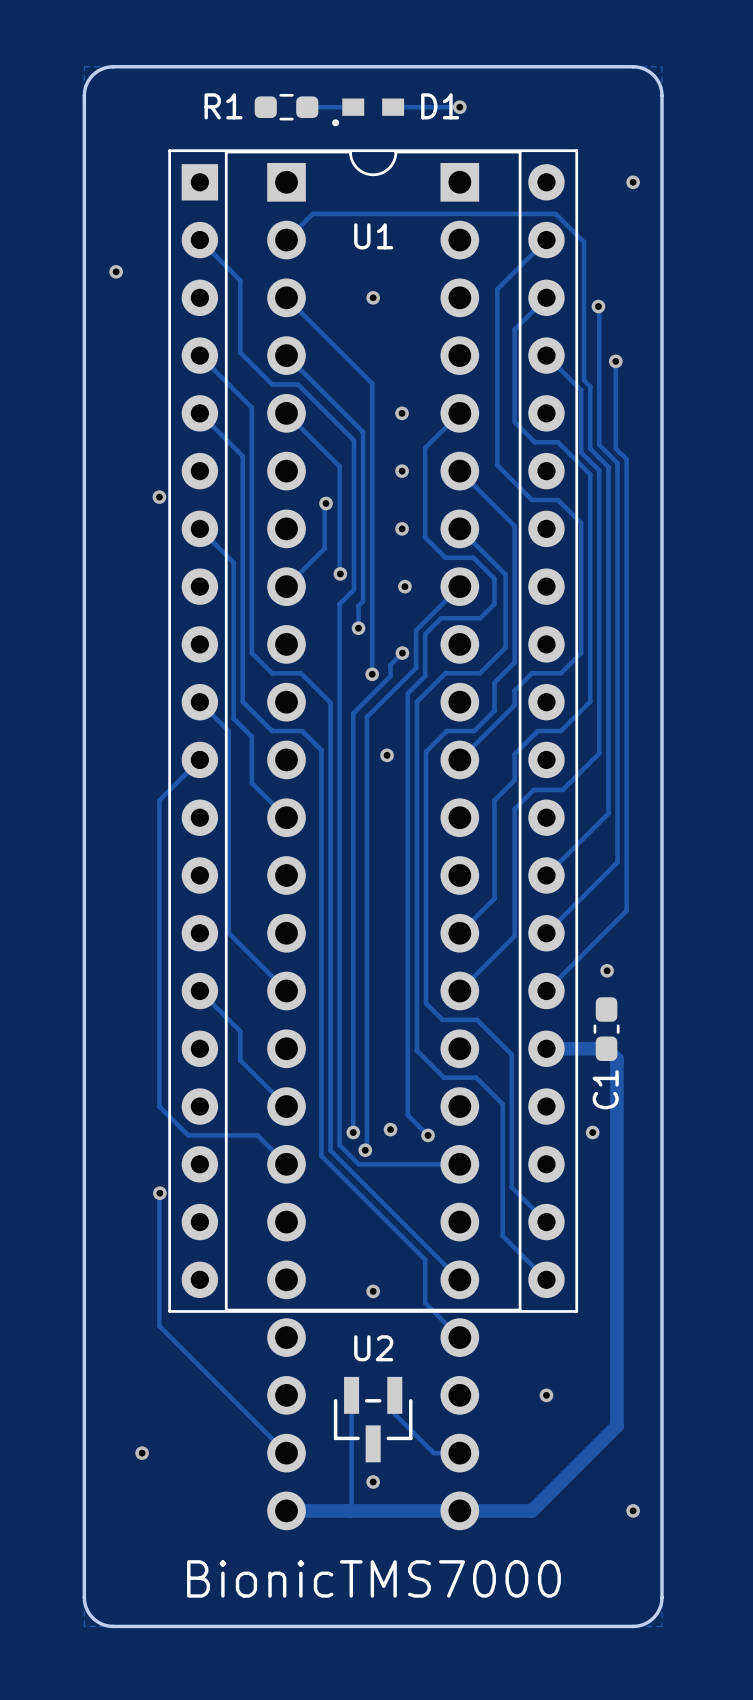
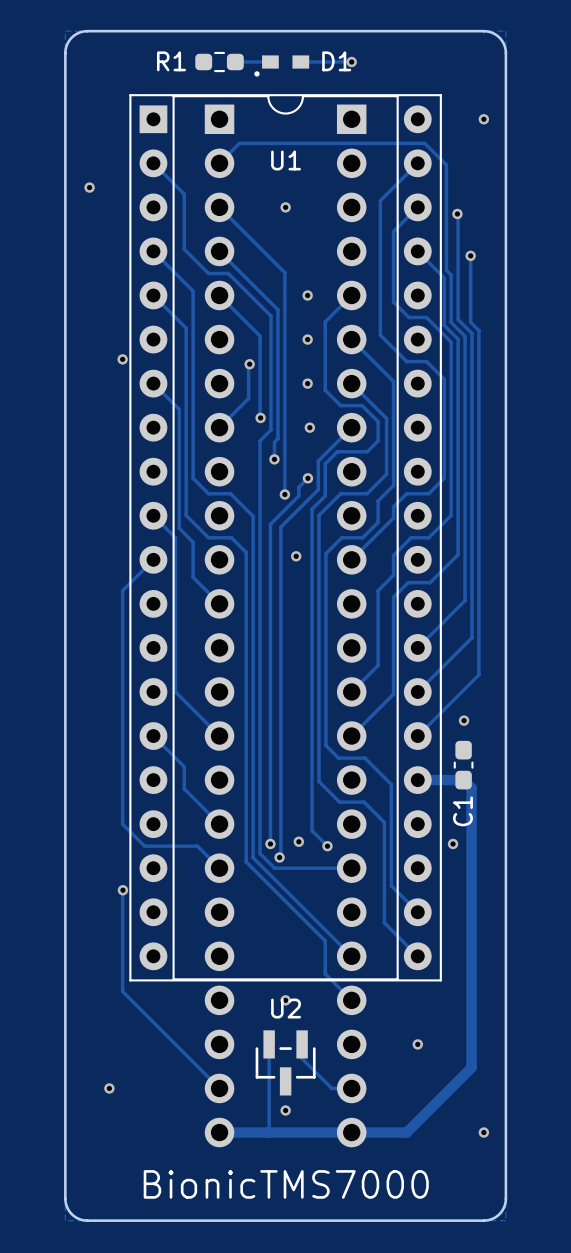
via position: (373, 1291) -> (285, 1000)

